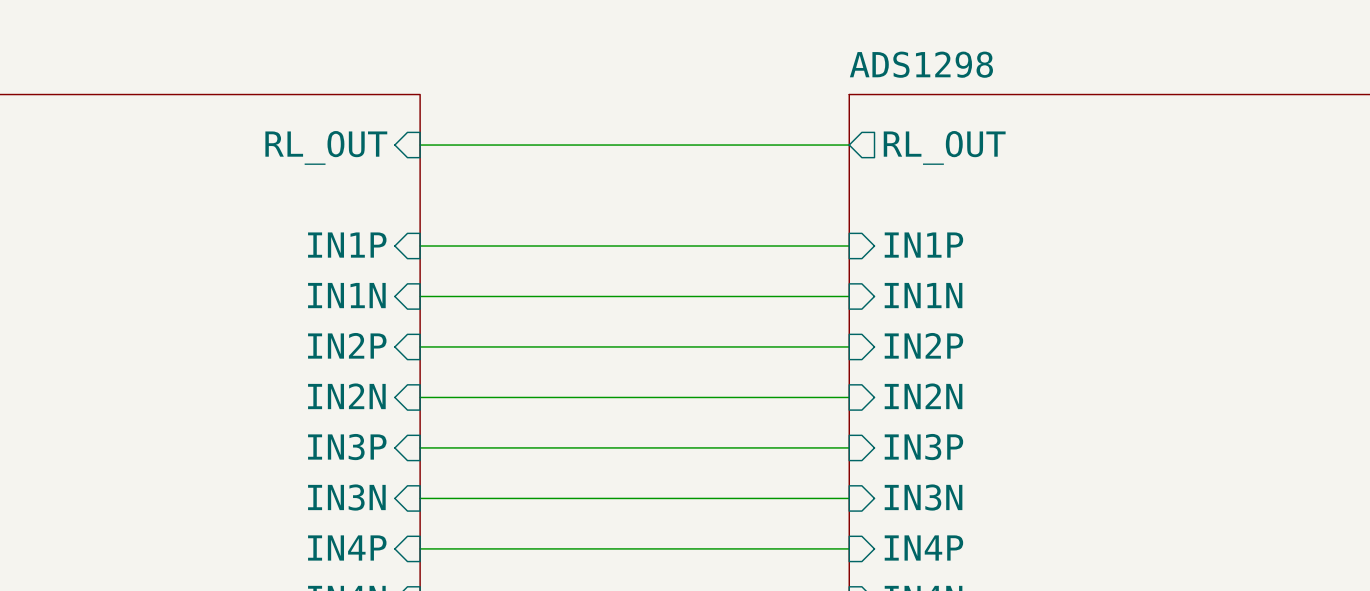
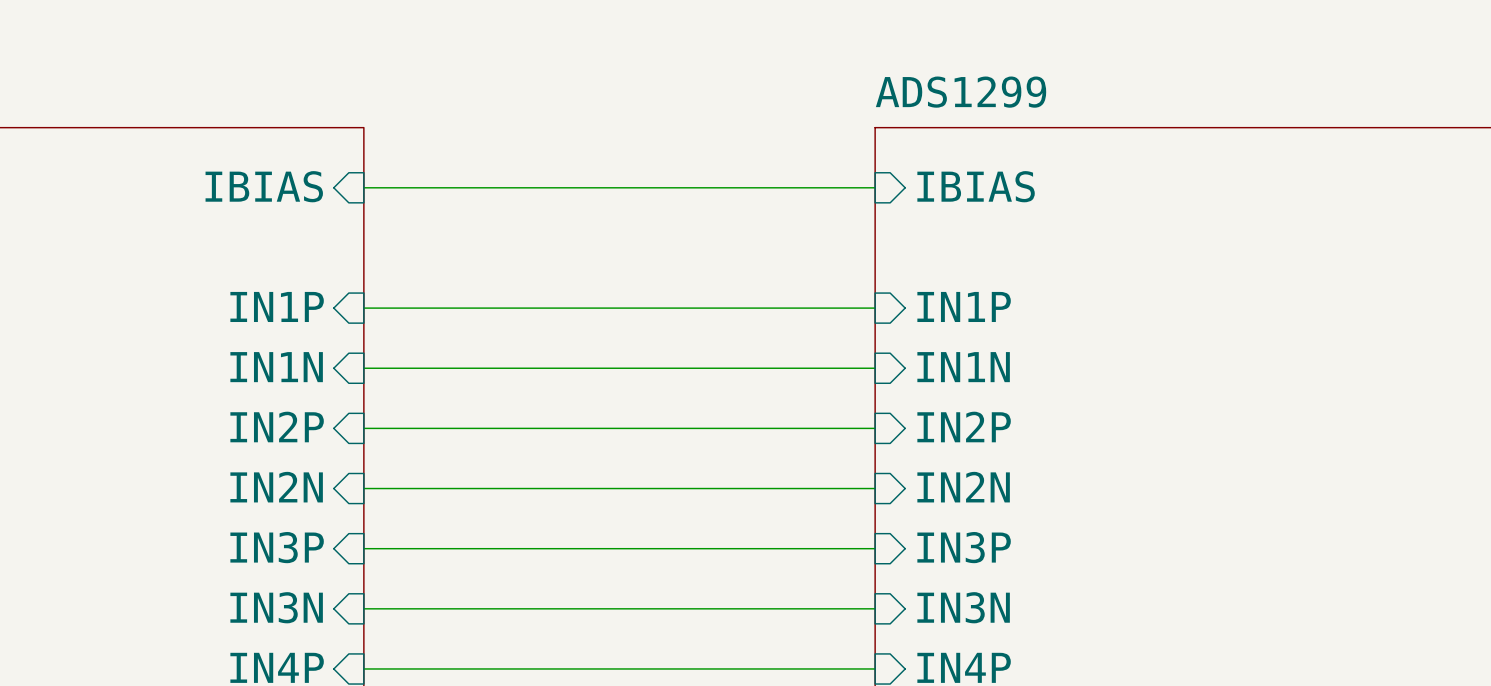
sheet ADS1298 name: ADS1298 (921, 64) -> ADS1299 (961, 92)
sheet pin: RL_OUT (326, 147) -> IBIAS (264, 186)
sheet pin shape: output (944, 147) -> input (976, 186)
sheet pin: RL_OUT (944, 147) -> IBIAS (976, 186)

